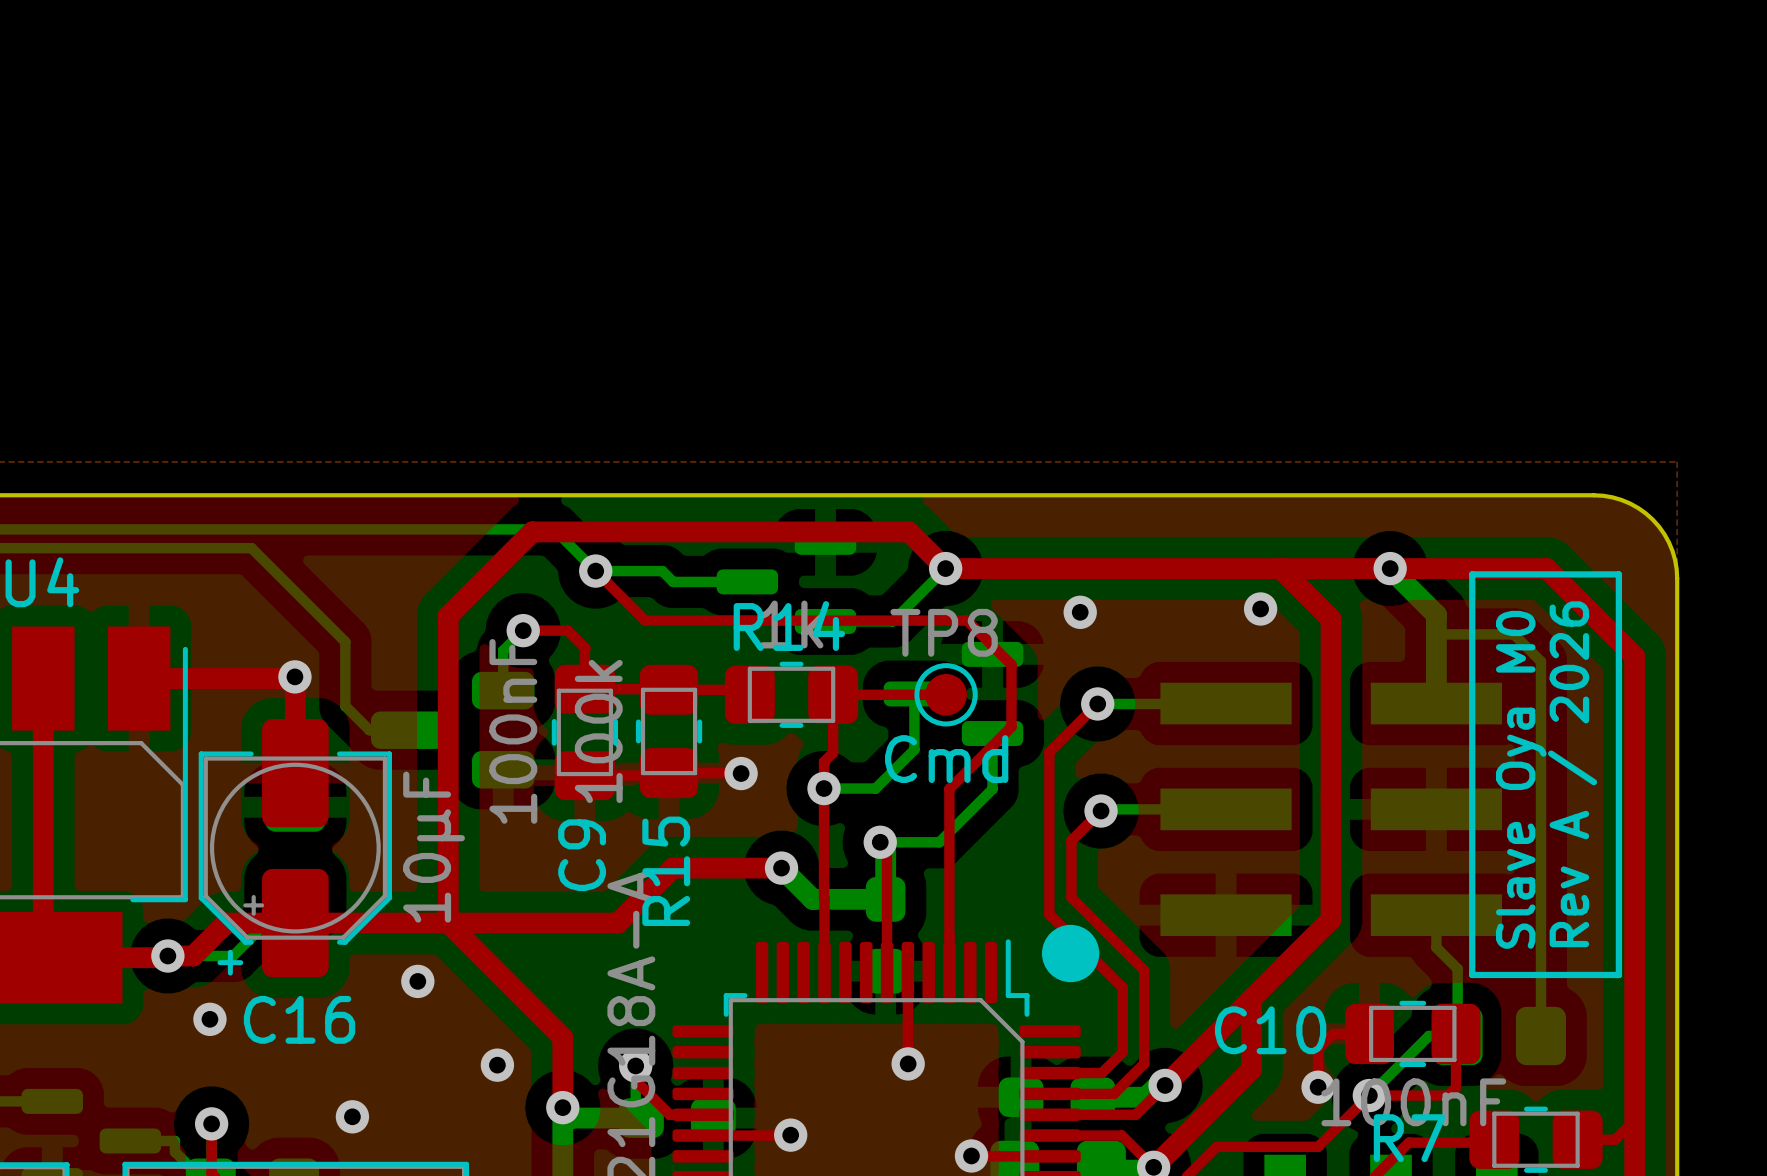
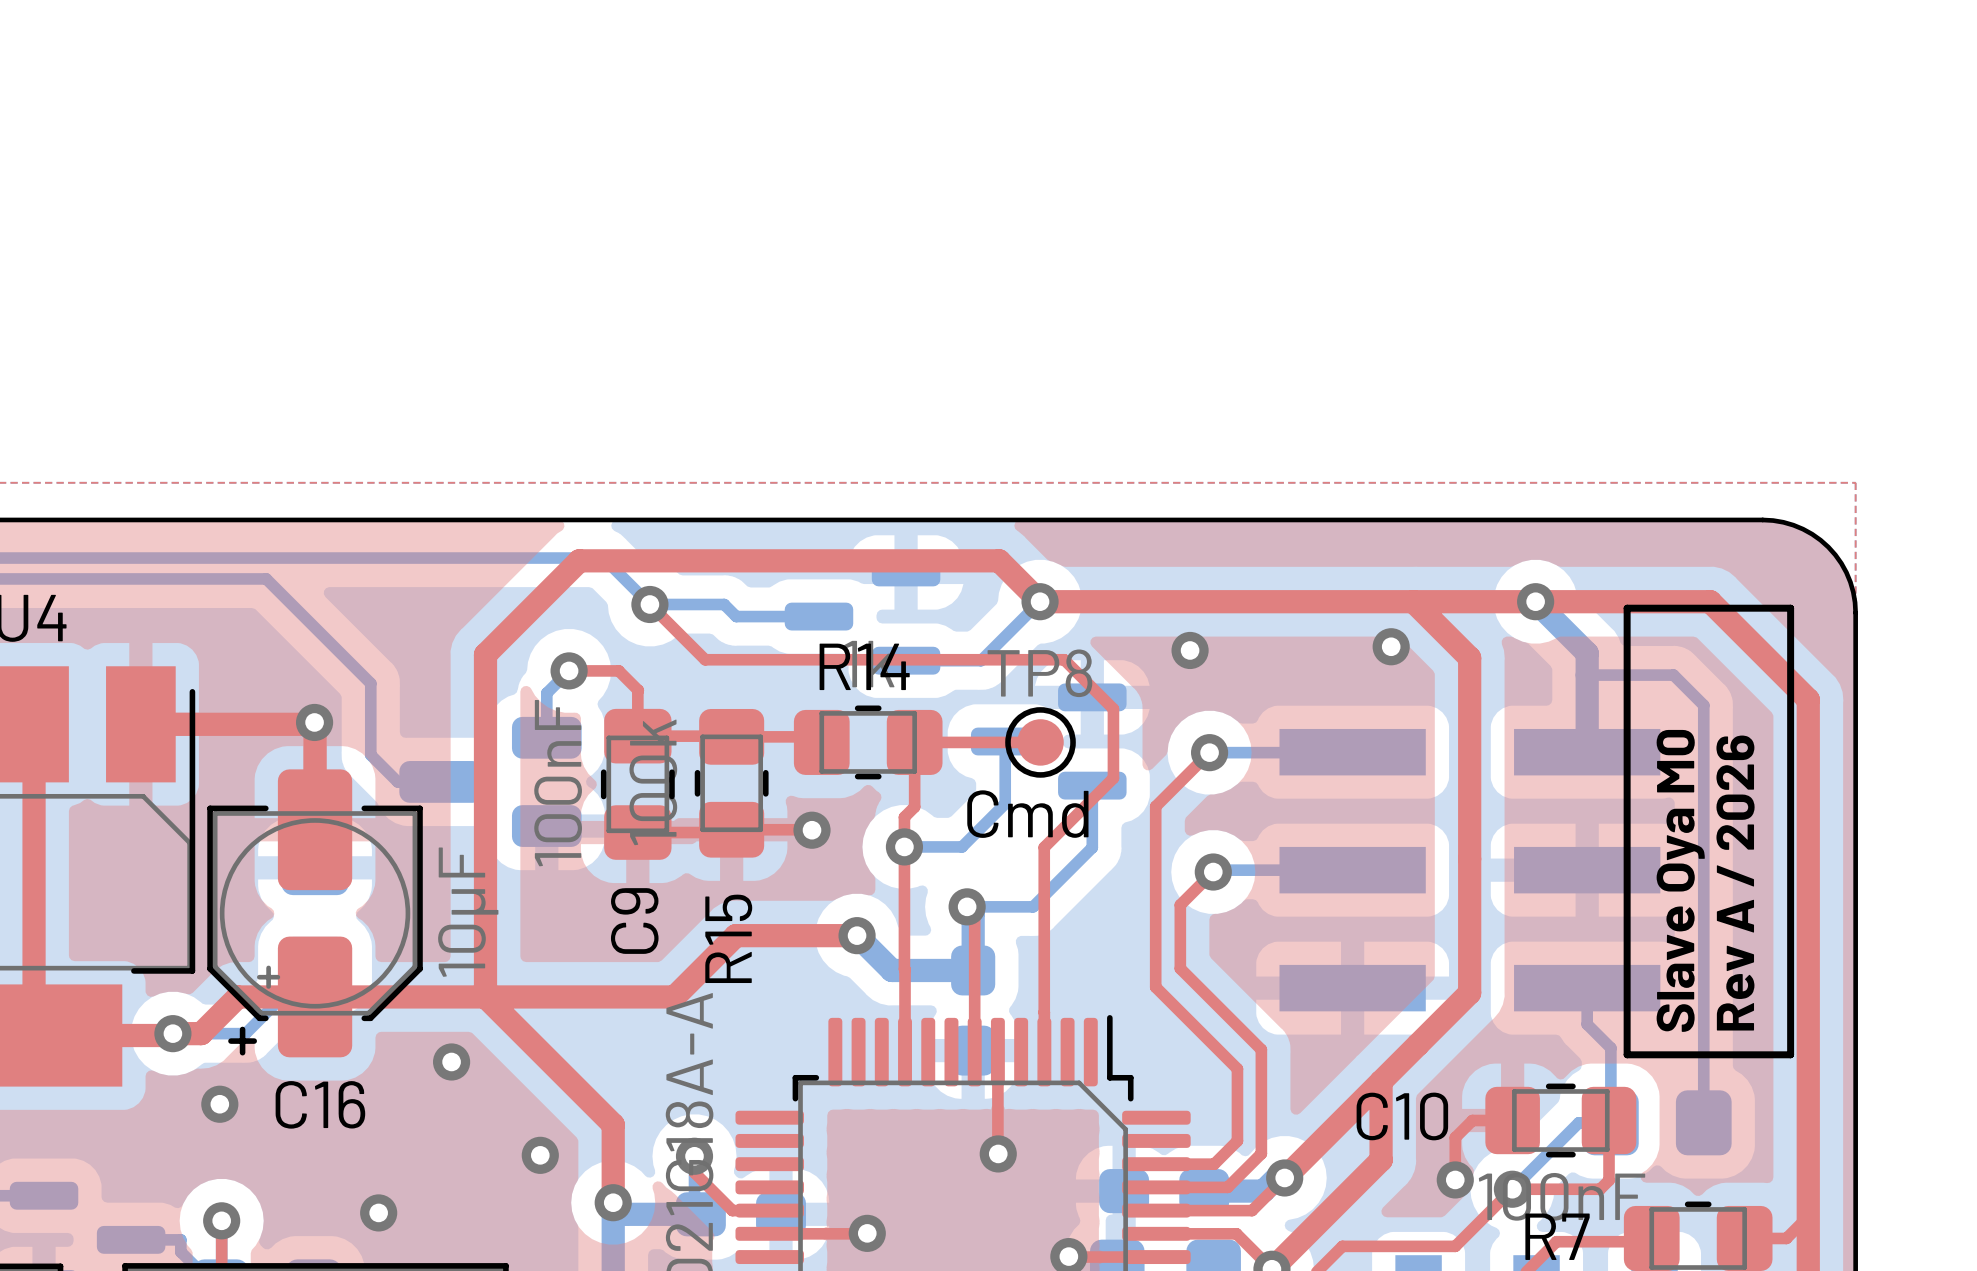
drawing: [1041, 924, 1100, 983] -> none

